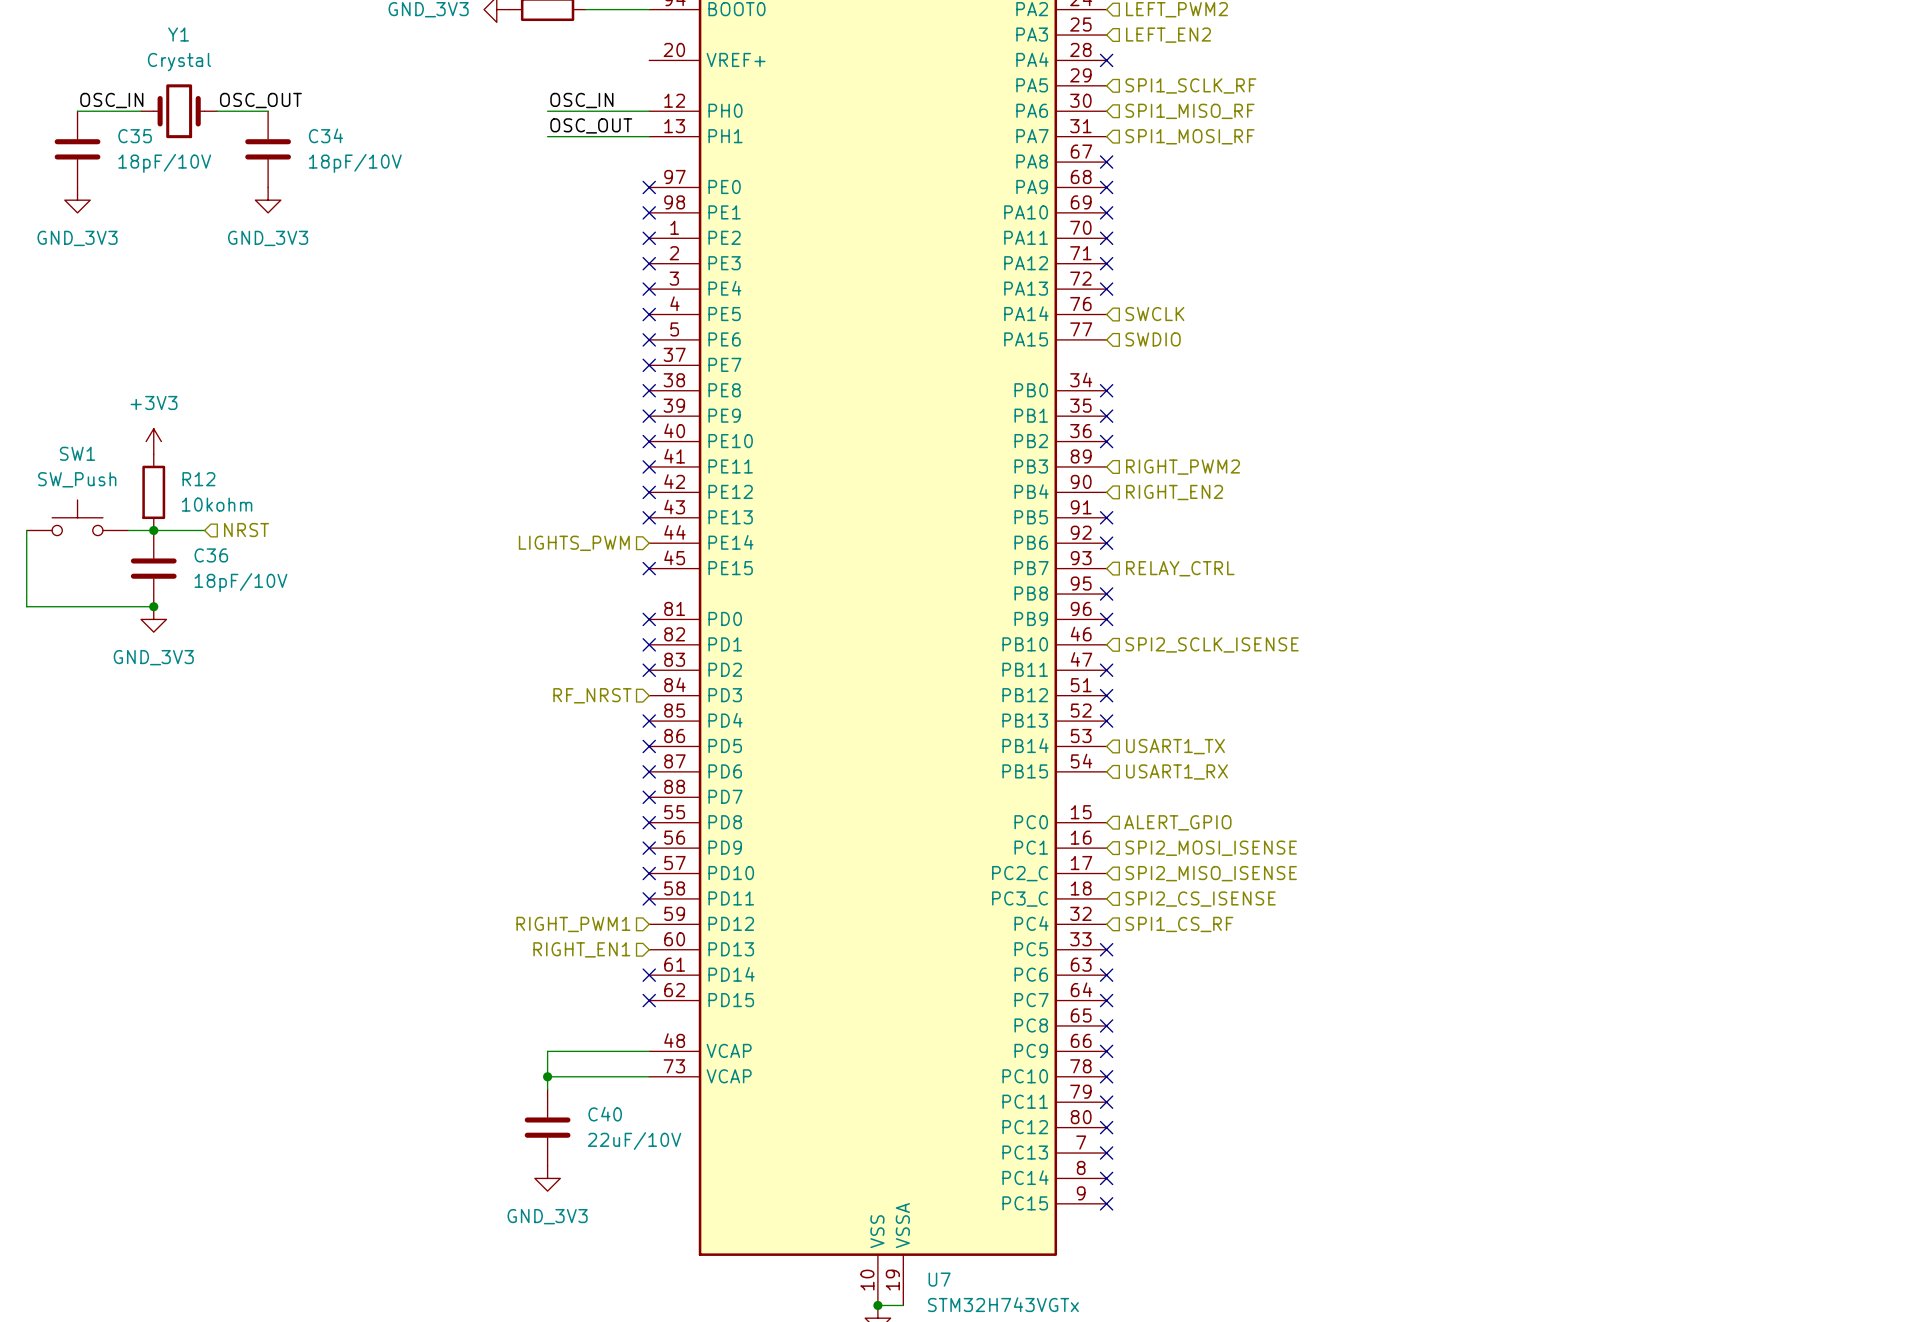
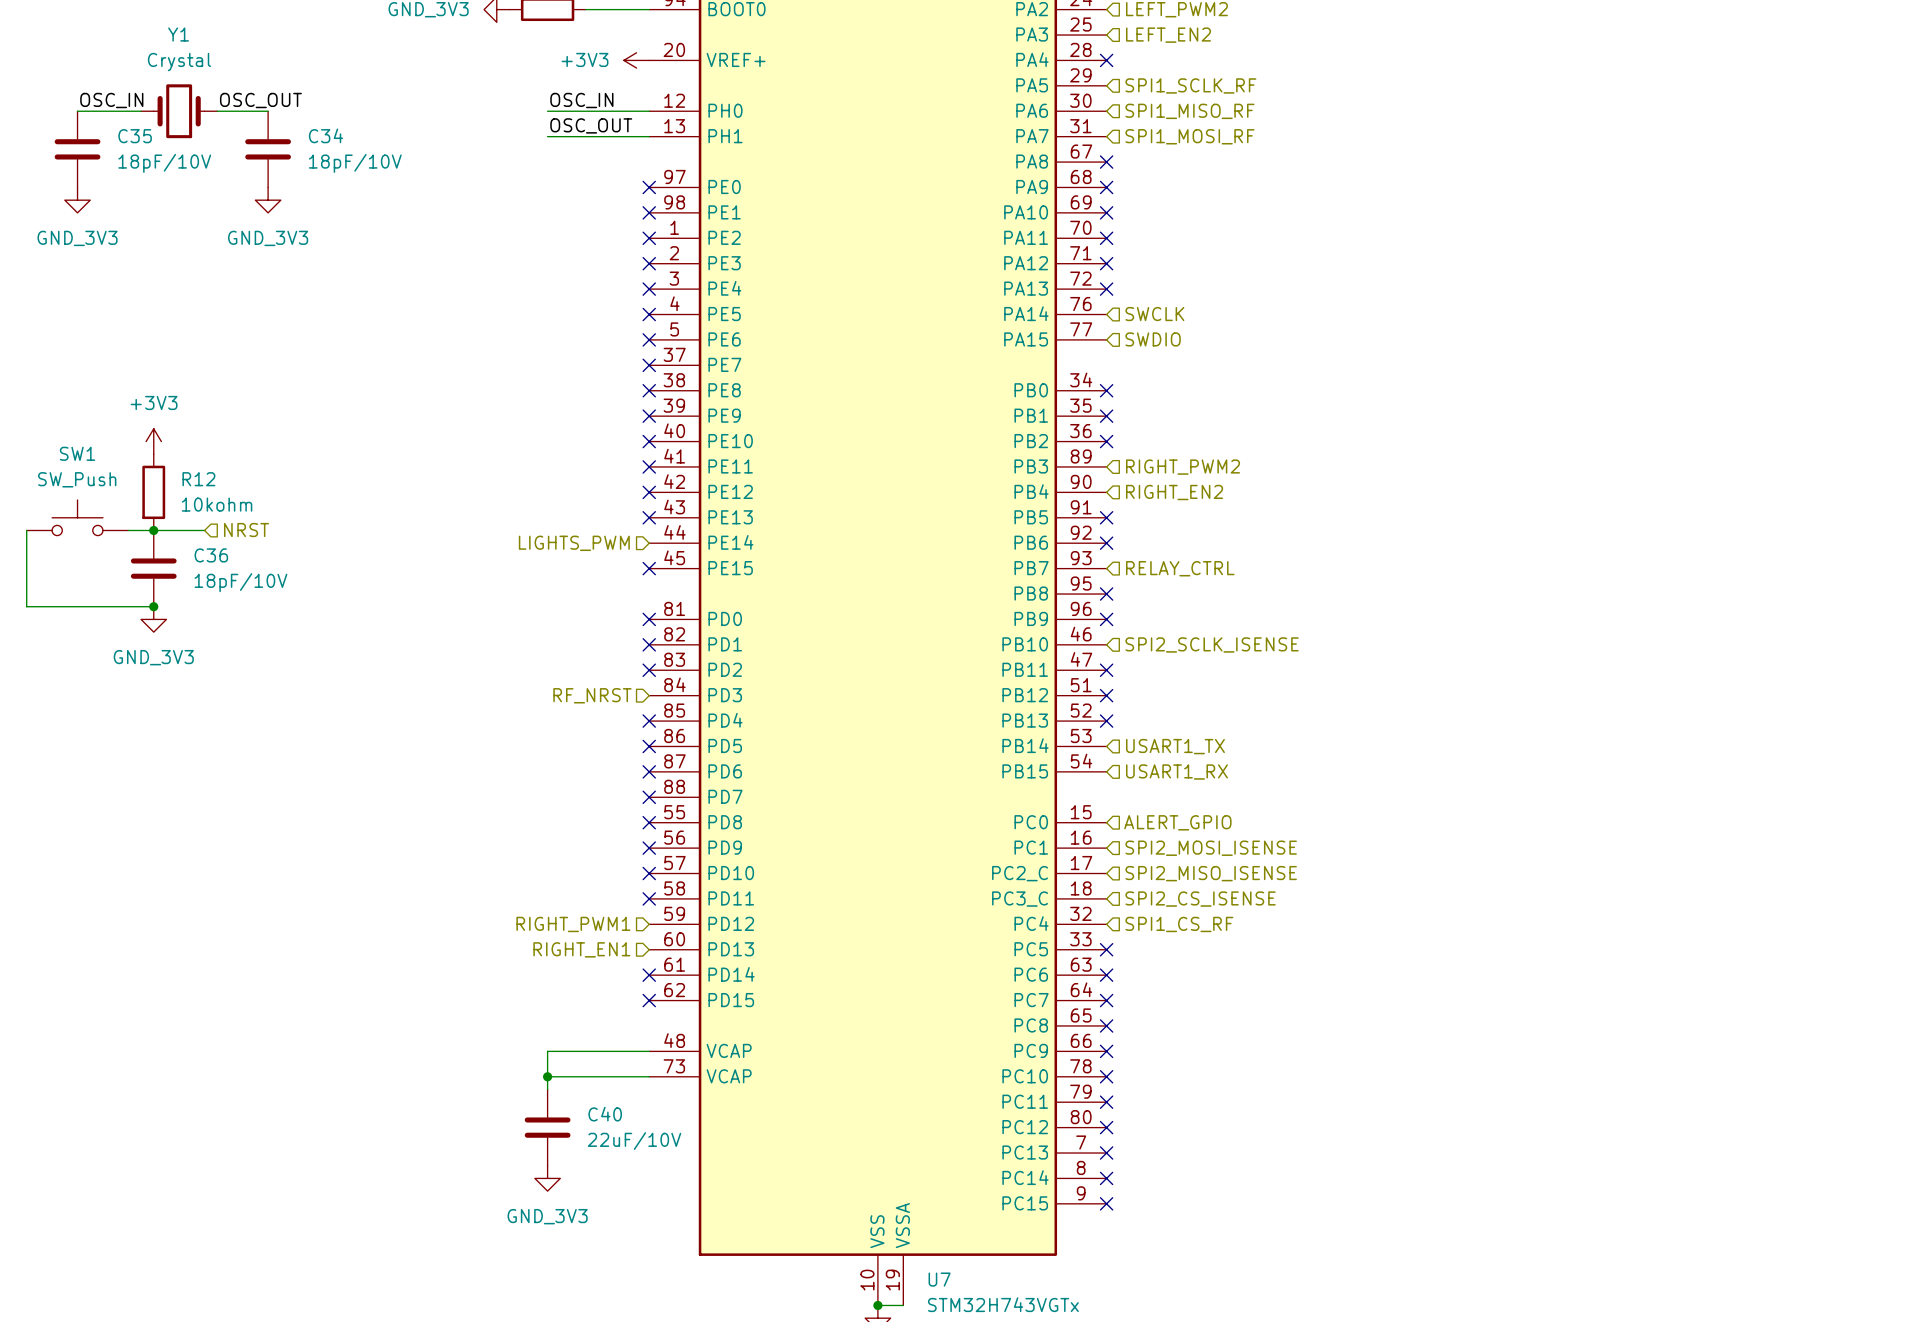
power symbol: none -> +3V3 (636, 60)

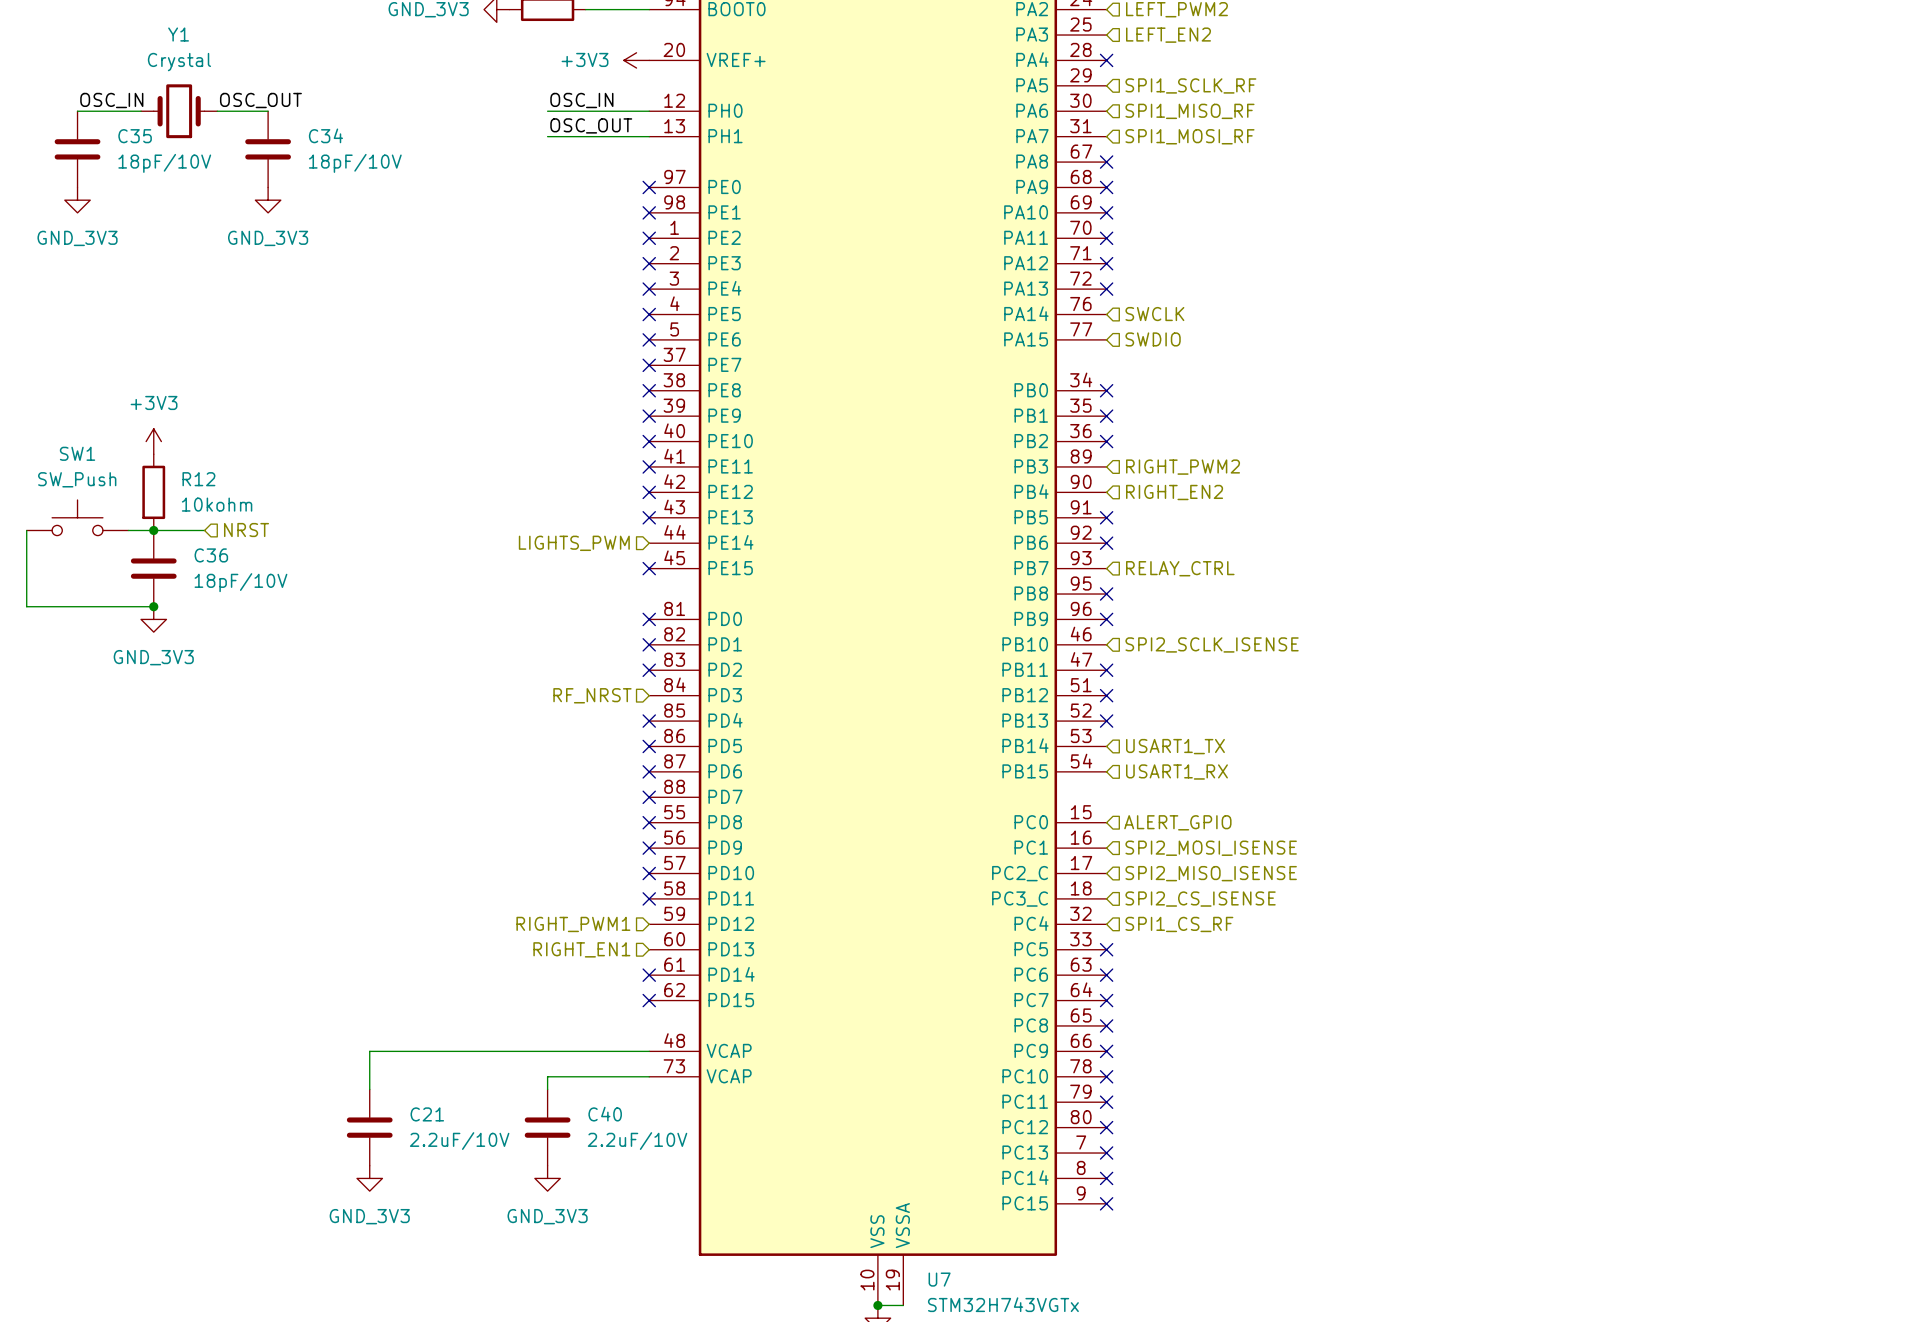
wire: (547, 1051) (547, 1076) -> (547, 1051) (369, 1051) (369, 1089)
junction: (547, 1076) -> none
C21: none -> 2.2uF/10V (369, 1127)
C40 value: 22uF/10V (634, 1141) -> 2.2uF/10V (637, 1141)
power symbol: none -> GND_3V3 (369, 1178)

